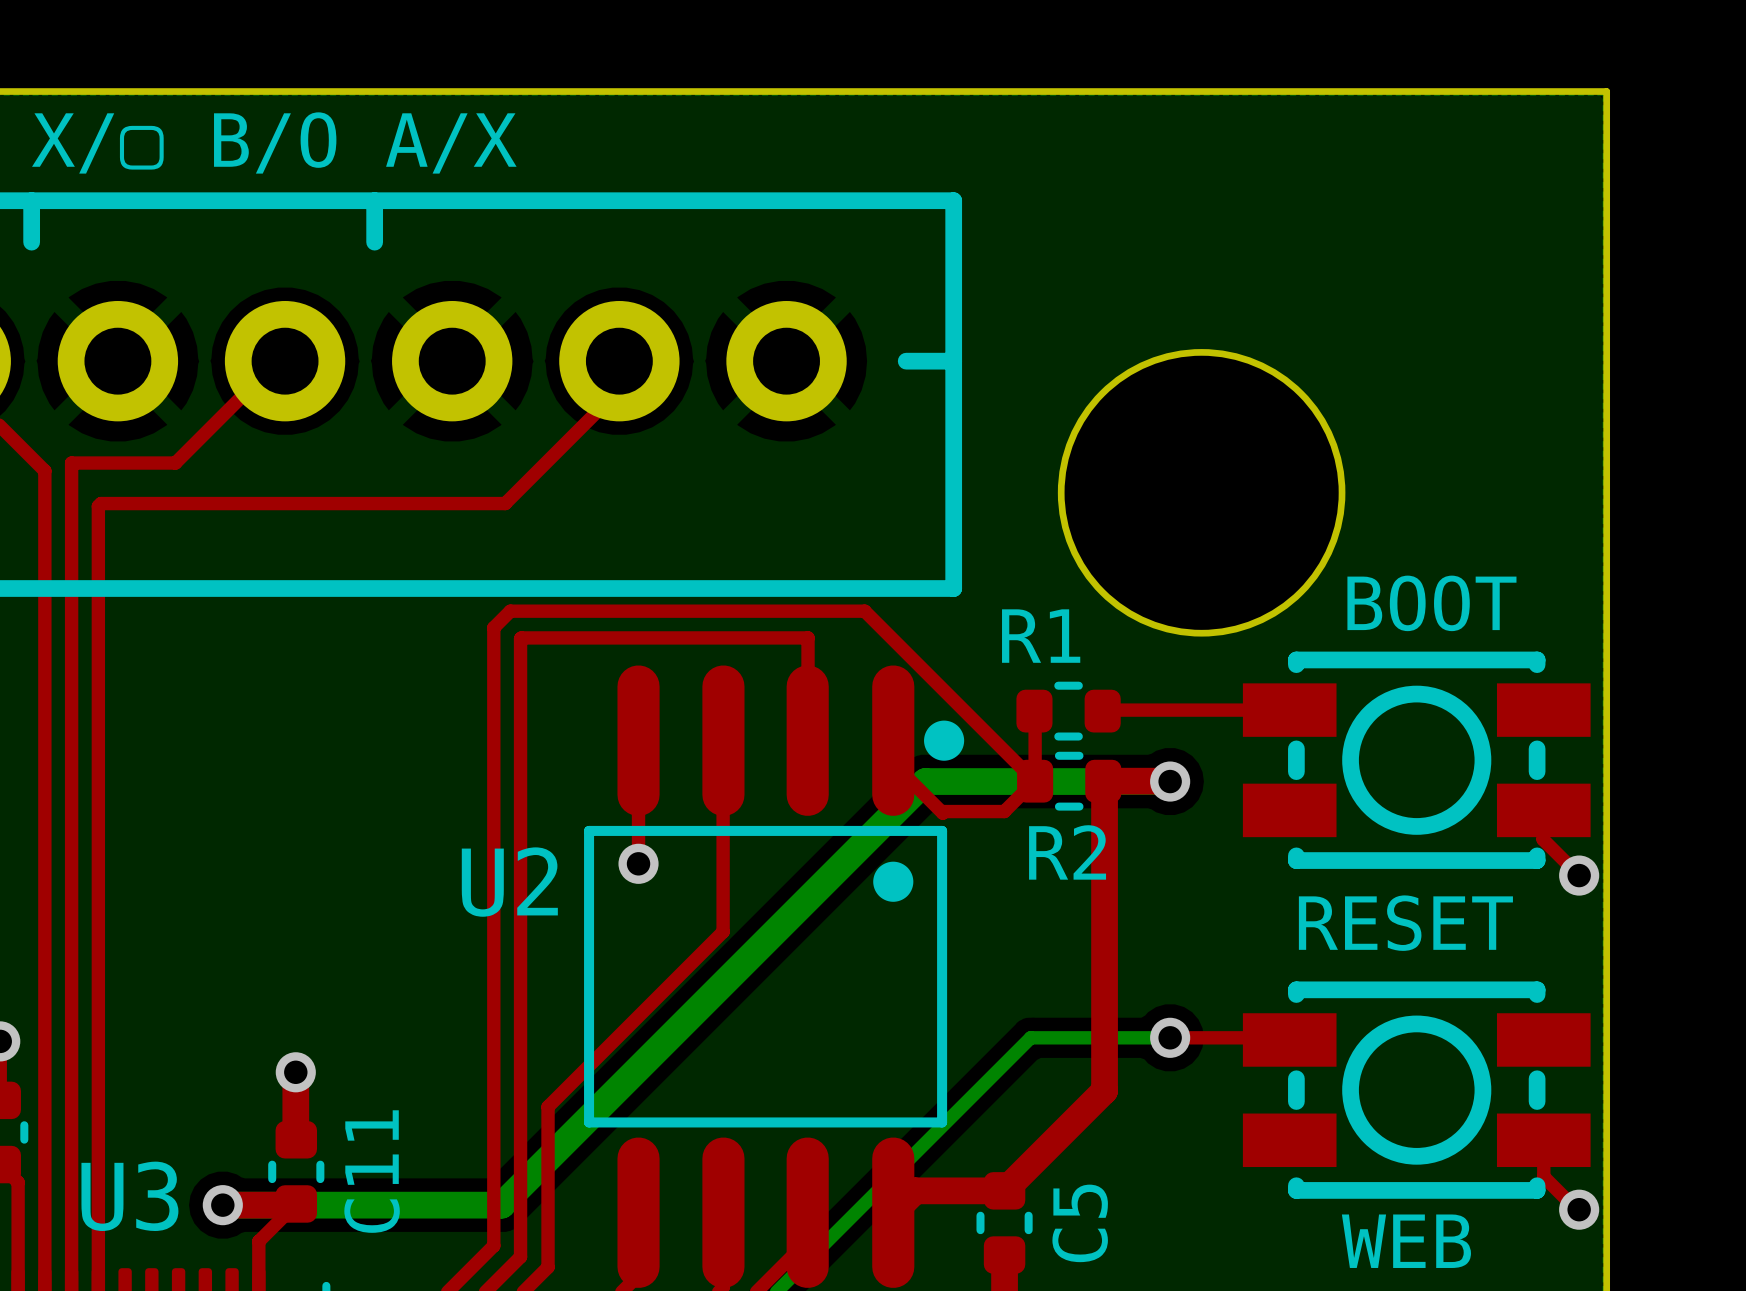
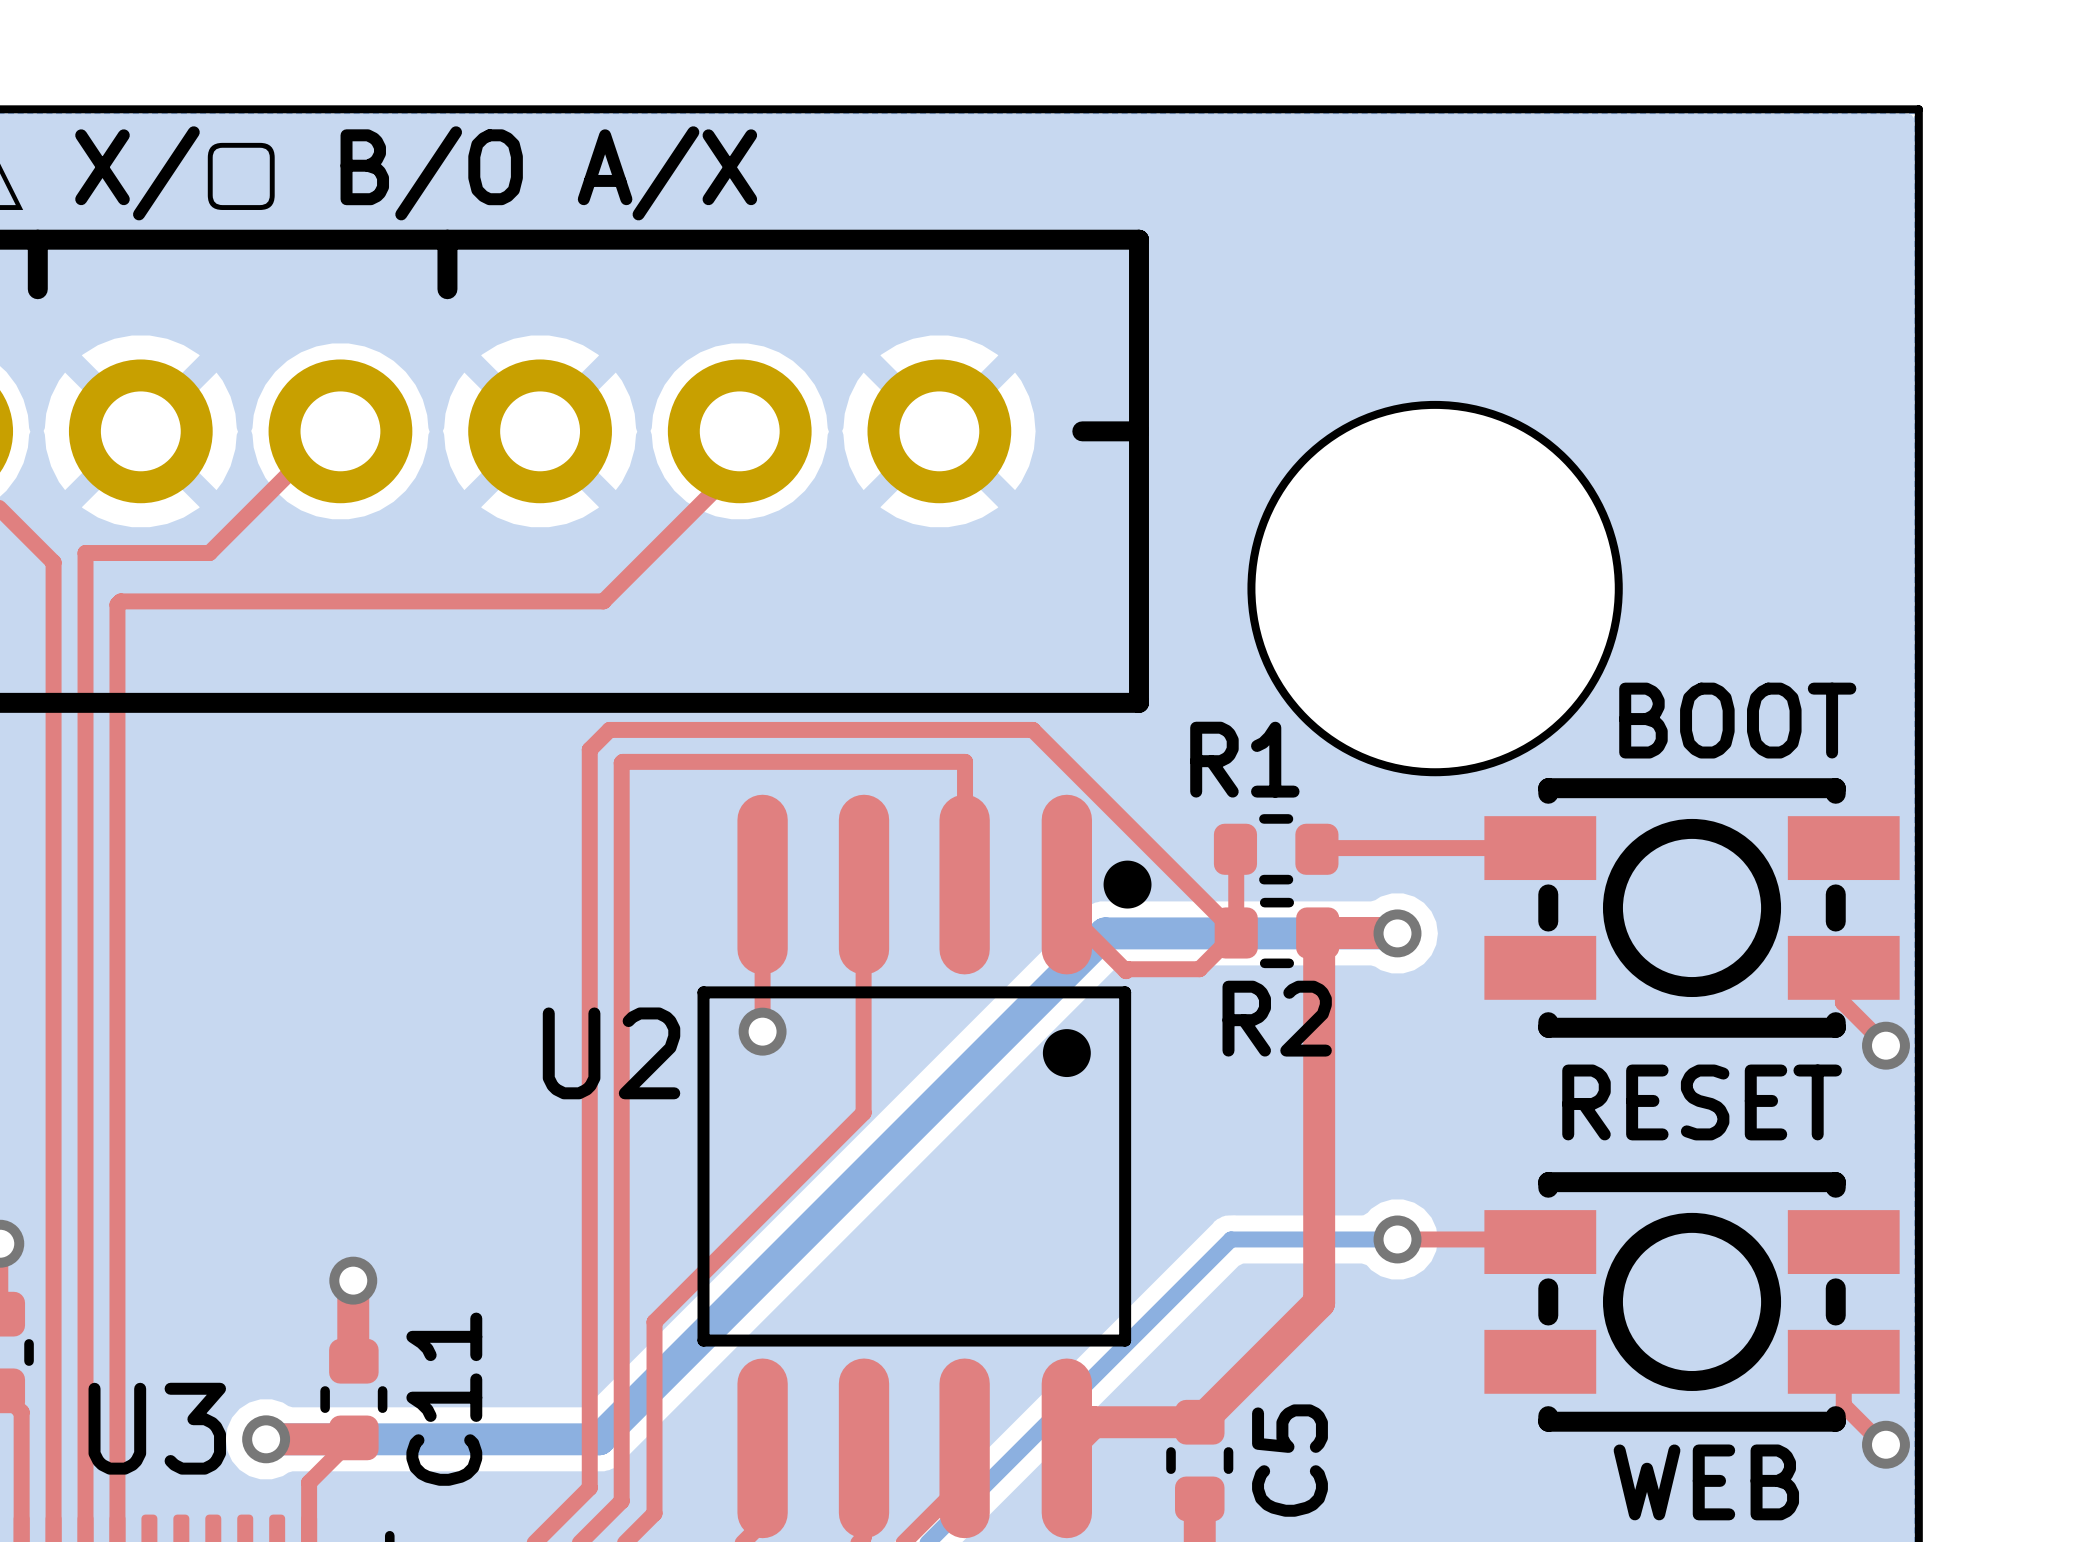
round board edge size: [1057, 349, 1346, 637] -> [1247, 400, 1623, 777]

